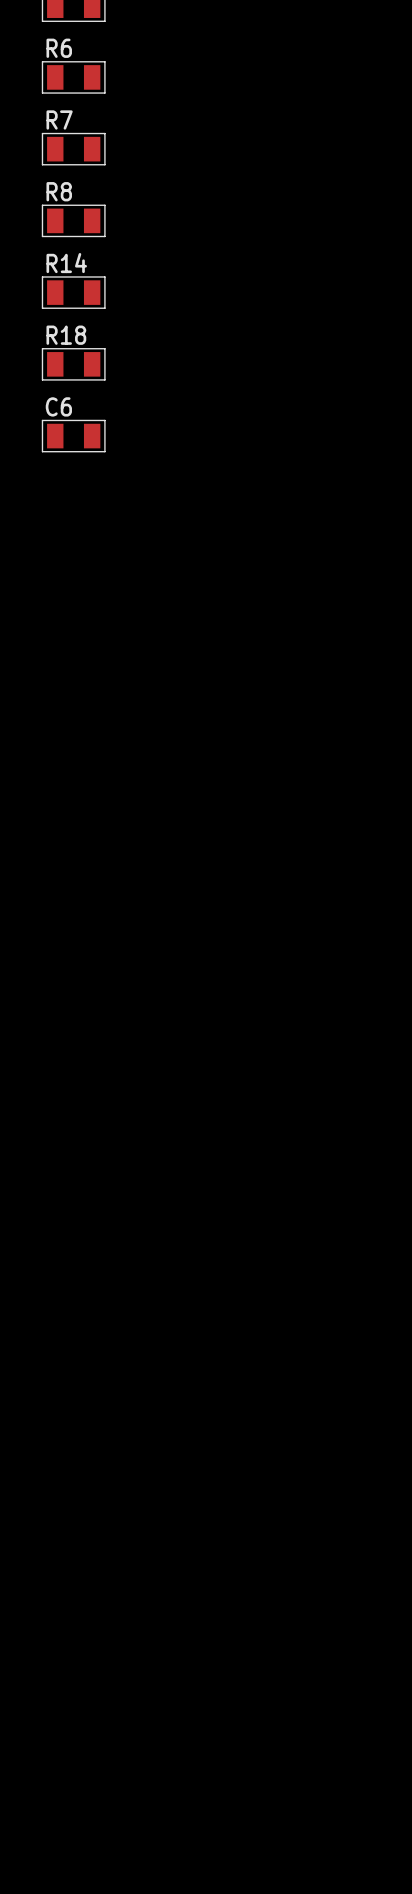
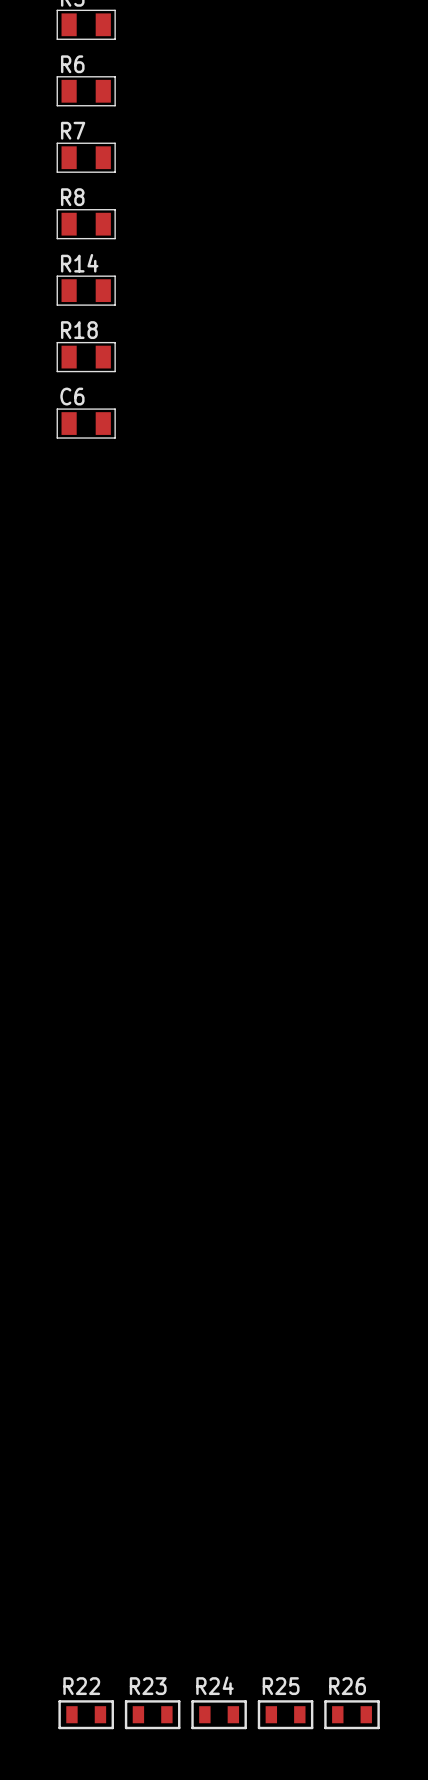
R22: none -> (86, 1714)
R23: none -> (152, 1714)
R24: none -> (219, 1714)
R25: none -> (285, 1714)
R26: none -> (352, 1714)

